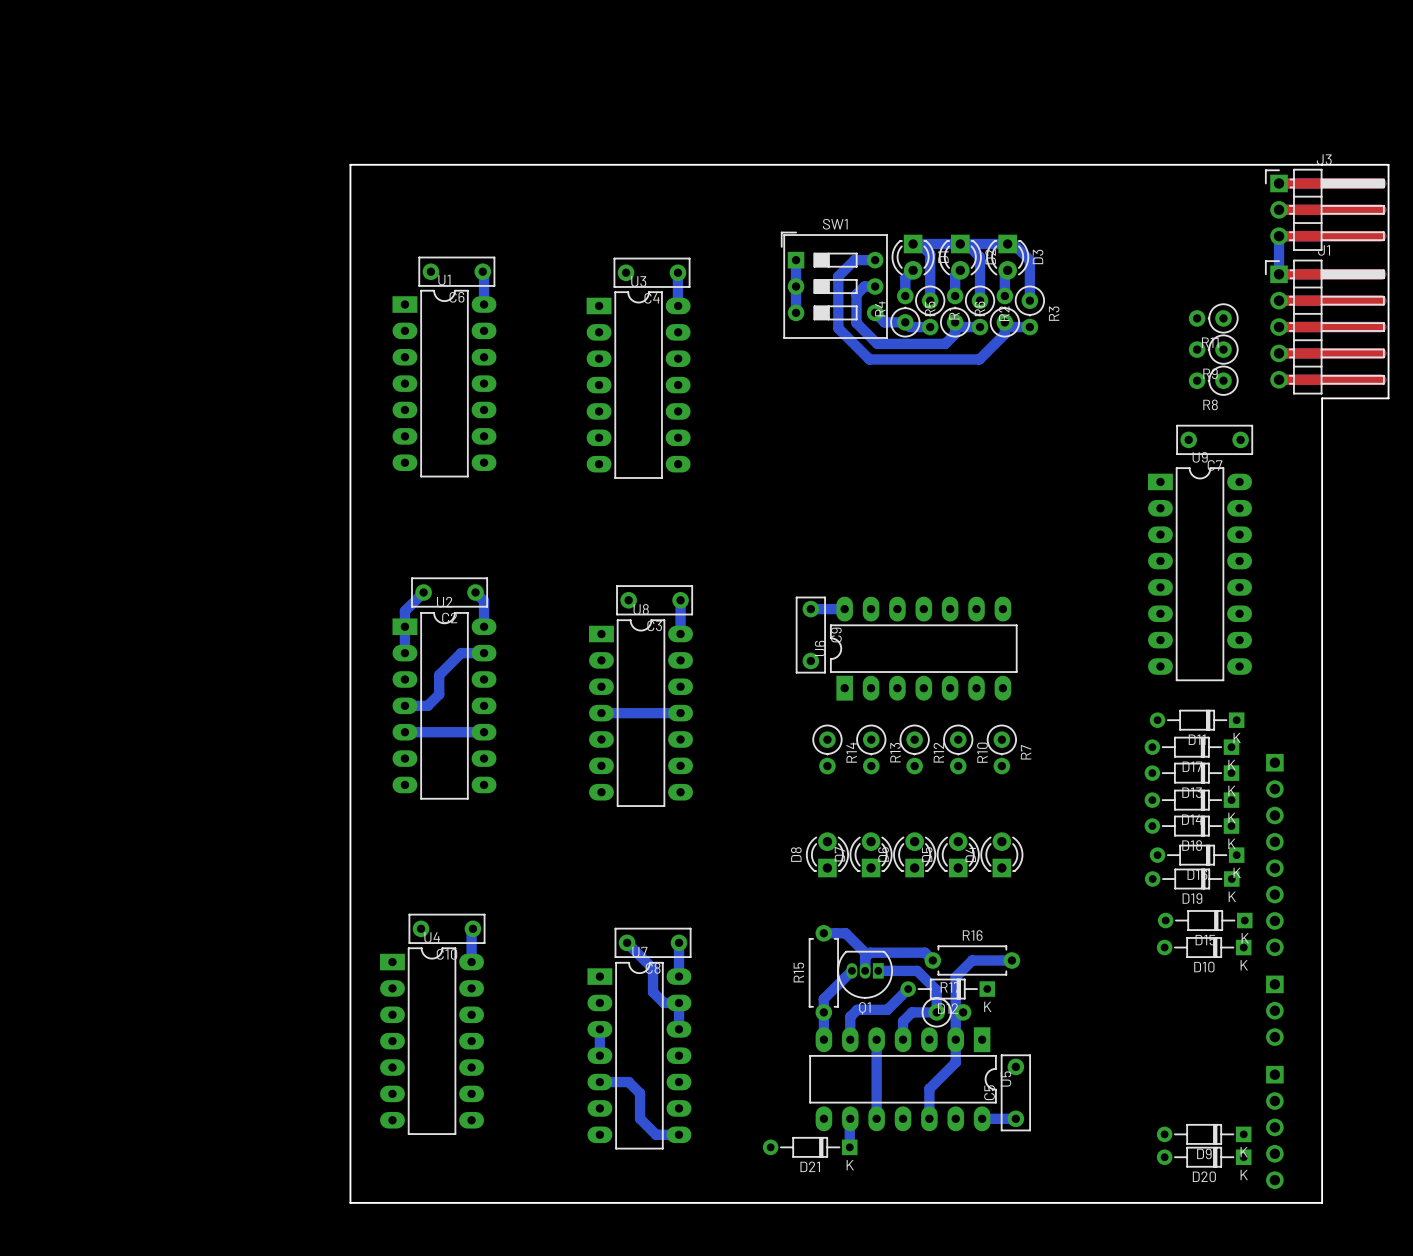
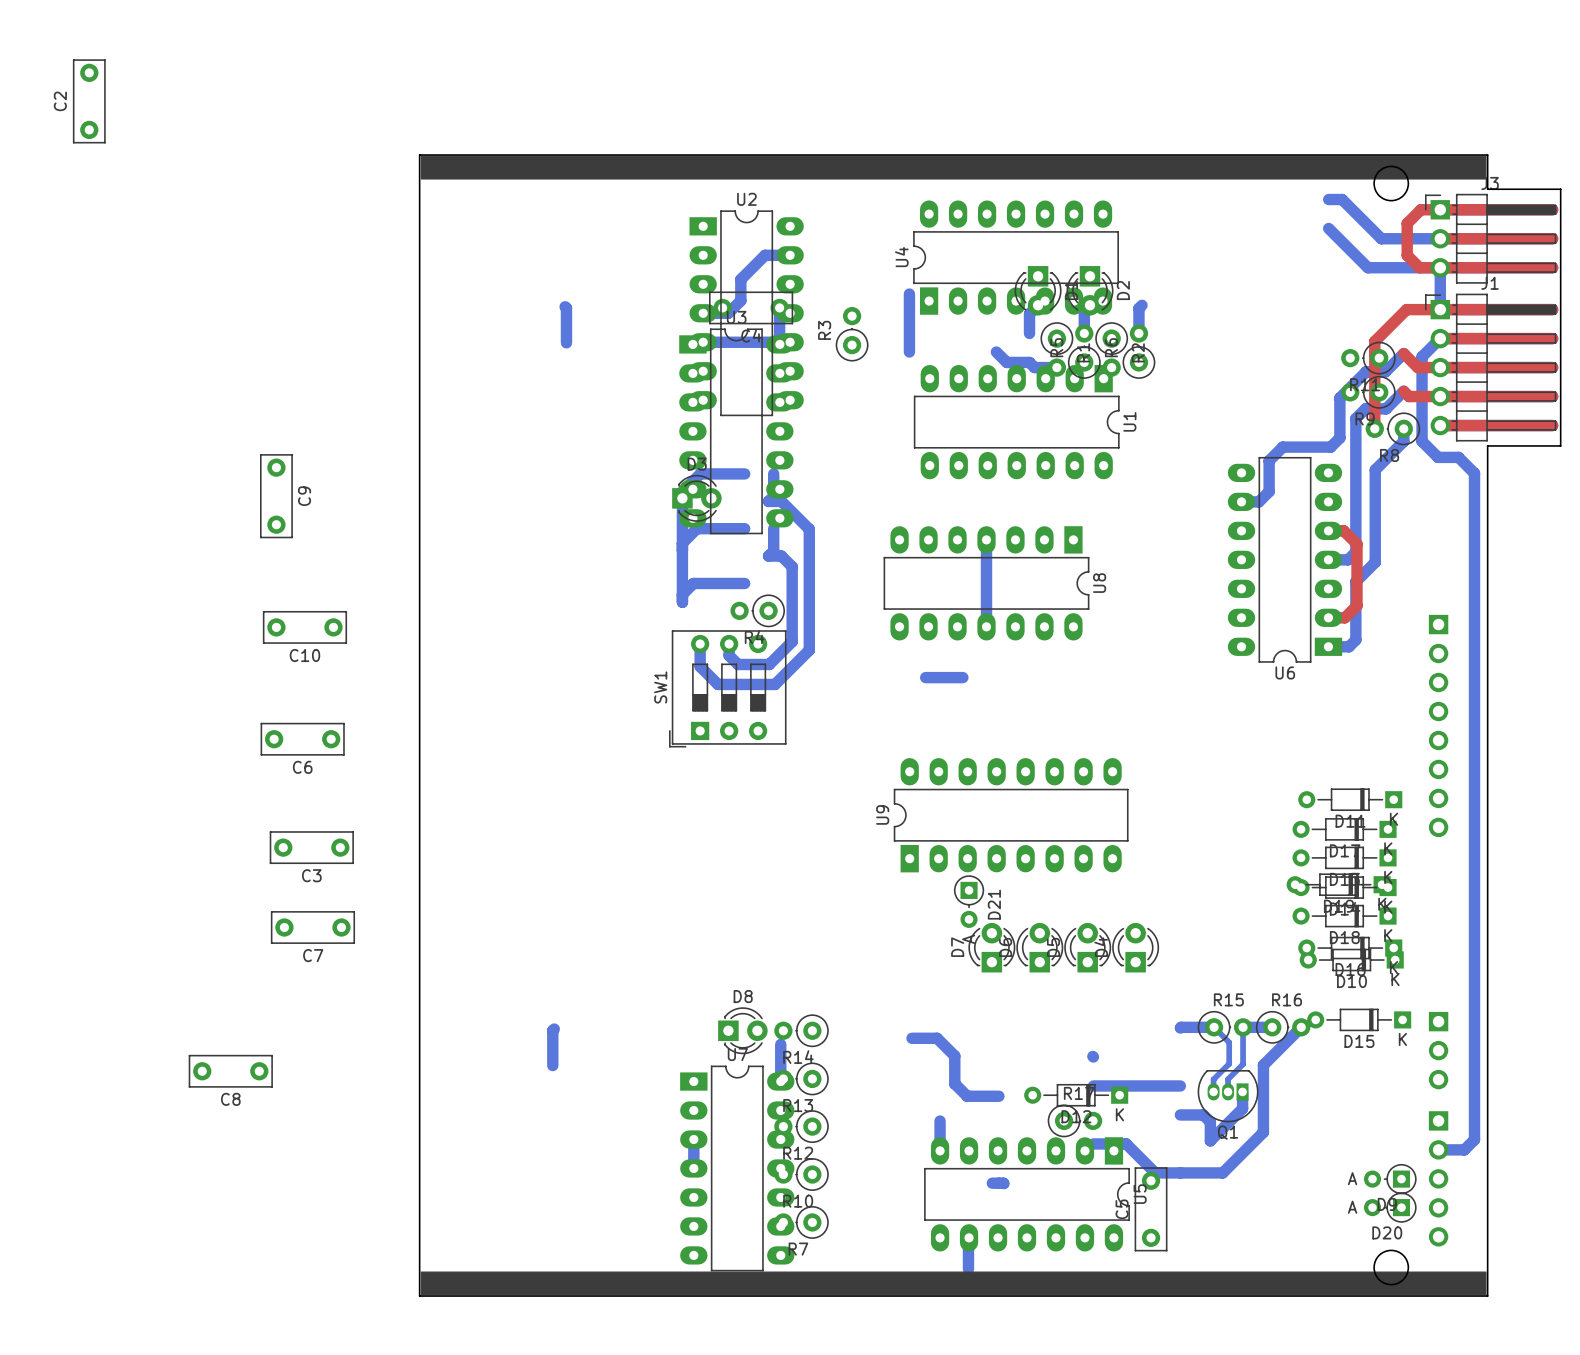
drawing: none -> [420, 155, 1487, 180]
round board edge: none -> [1373, 166, 1409, 201]
board edge: (350, 164) (1322, 164) -> (419, 189) (419, 155) (1487, 155) (1487, 189)
bottom track: none -> (1328, 199) (1342, 199) (1381, 238) (1440, 238)
top track: none -> (1440, 209) (1420, 209) (1407, 223) (1407, 255) (1419, 267) (1440, 267)
bottom track: none -> (1328, 228) (1367, 267) (1440, 267)
bottom track: none -> (790, 255) (765, 255) (740, 279) (740, 300) (728, 313) (703, 313)
bottom track: (913, 244) (1013, 244) (1029, 260) (1029, 300) -> none
bottom track: (920, 244) (930, 254) (930, 300) -> none
bottom track: (966, 244) (980, 257) (980, 300) -> none
D3 rotation: 0° (1007, 257) -> 90° counterclockwise (696, 498)
D3 position: (1007, 257) -> (696, 498)
bottom track: (875, 260) (854, 260) (838, 276) (838, 328) (869, 359) (979, 359) (1004, 334) (1004, 322) (1009, 327) (1029, 327) -> none
C6 position: (456, 271) -> (302, 739)
top track: none -> (1440, 309) (1406, 309) (1374, 341) (1374, 428)
SW1 rotation: 0° (834, 285) -> 90° counterclockwise (727, 688)
SW1 position: (834, 285) -> (727, 688)
bottom track: (875, 286) (864, 286) (856, 294) (856, 323) (877, 343) (945, 343) (955, 334) (955, 322) (959, 327) (980, 327) -> none
bottom track: none -> (1440, 338) (1422, 356) (1422, 441) (1438, 457) (1458, 457) (1474, 473) (1474, 1139) (1464, 1149) (1438, 1149)
bottom track: none -> (703, 342) (790, 342)
R3 rotation: 0° (1029, 310) -> 180° (852, 334)
R3 position: (1029, 310) -> (852, 334)
R4 rotation: 0° (905, 312) -> 90° counterclockwise (757, 610)
R4 position: (905, 312) -> (757, 610)
bottom track: none -> (1403, 353) (1385, 371) (1366, 371) (1339, 398) (1339, 437) (1330, 447) (1282, 447) (1269, 460) (1269, 491) (1258, 501) (1241, 501)
top track: none -> (1403, 353) (1417, 367) (1440, 367)
bottom track: none -> (1403, 391) (1386, 408) (1365, 408) (1355, 418) (1355, 552) (1348, 559) (1328, 559)
top track: none -> (1403, 391) (1409, 396) (1440, 396)
R8 position: (1213, 380) -> (1392, 428)
bottom track: none -> (1403, 428) (1403, 441) (1375, 469) (1375, 562) (1355, 581) (1355, 639) (1349, 646) (1328, 646)
U1 rotation: 0° (444, 383) -> 90° clockwise (1016, 422)
U1 position: (444, 383) -> (1016, 422)
bottom track: none -> (744, 473) (700, 473) (682, 491) (682, 602)
bottom track: none -> (773, 473) (773, 496) (768, 501) (781, 501) (809, 529) (809, 650) (775, 684) (718, 684) (700, 666) (700, 644)
C7 position: (1214, 439) -> (312, 927)
bottom track: none -> (744, 528) (696, 528) (682, 543)
bottom track: none -> (773, 528) (773, 550) (768, 556) (781, 556) (792, 566) (792, 641) (769, 664) (737, 664) (729, 655) (729, 644)
top track: none -> (1328, 530) (1343, 530) (1357, 544) (1357, 605) (1344, 617) (1328, 617)
bottom track: none -> (986, 539) (986, 626)
bottom track: none -> (744, 583) (693, 583) (682, 594)
U9 rotation: 0° (1200, 574) -> 90° counterclockwise (1011, 815)
U9 position: (1200, 574) -> (1011, 815)
bottom track: (423, 592) (404, 611) (404, 653) -> none
C2 rotation: 0° (449, 592) -> 90° clockwise (89, 101)
C2 position: (449, 592) -> (89, 101)
bottom track: (475, 592) (484, 601) (484, 626) -> none
C3 position: (654, 600) -> (311, 847)
bottom track: (680, 600) (680, 634) -> none
C9 position: (810, 635) -> (276, 496)
U6 rotation: 0° (923, 648) -> 90° counterclockwise (1285, 559)
U6 position: (923, 648) -> (1285, 559)
bottom track: (484, 653) (461, 653) (439, 675) (439, 694) (427, 705) (404, 705) -> none
U2 position: (444, 705) -> (746, 313)
bottom track: (601, 713) (680, 713) -> none
U8 rotation: 0° (641, 713) -> 90° clockwise (986, 583)
U8 position: (641, 713) -> (986, 583)
bottom track: (404, 732) (484, 732) -> none
R14 rotation: 0° (827, 749) -> 90° clockwise (801, 1030)
R14 position: (827, 749) -> (801, 1030)
R13 rotation: 0° (871, 749) -> 90° clockwise (801, 1078)
R13 position: (871, 749) -> (801, 1078)
R12 rotation: 0° (914, 749) -> 90° clockwise (801, 1126)
R12 position: (914, 749) -> (801, 1126)
R10 rotation: 0° (958, 749) -> 90° clockwise (801, 1174)
R10 position: (958, 749) -> (801, 1174)
R7 rotation: 0° (1001, 749) -> 90° clockwise (801, 1222)
R7 position: (1001, 749) -> (801, 1222)
D8 rotation: 0° (827, 854) -> 90° clockwise (742, 1030)
D8 position: (827, 854) -> (742, 1030)
part position: (1274, 855) -> (1438, 725)
D19 position: (1192, 879) -> (1338, 884)
R15 footprint: [808, 924, 839, 1021] -> [1197, 1011, 1253, 1044]
bottom track: none -> (1180, 1028) (1214, 1027) (1229, 1042) (1229, 1063) (1213, 1079) (1213, 1091)
bottom track: none -> (1272, 1027) (1243, 1027) (1243, 1064) (1228, 1079) (1228, 1091)
bottom track: none -> (1301, 1027) (1263, 1065) (1263, 1132) (1222, 1172) (1155, 1172) (1126, 1143) (1093, 1143)
C10 position: (446, 928) -> (304, 627)
bottom track: (823, 933) (845, 933) (865, 952) (865, 970) -> none
bottom track: none -> (911, 1038) (937, 1038) (954, 1055) (954, 1083) (967, 1096) (998, 1096)
bottom track: (627, 942) (653, 968) (653, 992) (663, 1002) (679, 1002) (679, 1029) -> none
C8 position: (653, 942) -> (230, 1071)
R16 footprint: [924, 945, 1021, 976] -> [1255, 1011, 1311, 1044]
D10 position: (1204, 947) -> (1351, 960)
bottom track: none -> (1092, 1056) (1093, 1057)
bottom track: (865, 957) (870, 952) (925, 952) (932, 960) -> none
bottom track: (1011, 960) (972, 960) (955, 977) (955, 1062) (929, 1088) (929, 1118) -> none
bottom track: (851, 970) (823, 999) (823, 1012) -> none
bottom track: (878, 970) (917, 970) (936, 990) (936, 1012) (912, 1012) (903, 1021) (903, 1039) -> none
R15 name position: R15 (798, 972) -> R15 (1228, 999)
Q1 position: (865, 974) -> (1228, 1096)
bottom track: none -> (1093, 1085) (1180, 1085)
bottom track: none -> (1242, 1091) (1242, 1108) (1210, 1140) (1210, 1122) (1203, 1114) (1180, 1114)
bottom track: (908, 989) (887, 1009) (857, 1009) (850, 1016) (850, 1039) -> none
part position: (1274, 1010) -> (1438, 1050)
bottom track: (876, 1039) (876, 1118) -> none
U4 rotation: 0° (432, 1041) -> 90° counterclockwise (1016, 257)
U4 position: (432, 1041) -> (1016, 257)
bottom track: none -> (992, 1183) (1003, 1183)
bottom track: (599, 1082) (628, 1082) (640, 1093) (640, 1118) (656, 1134) (679, 1134) -> none
bottom track: (982, 1118) (1015, 1118) -> none
D9 footprint: [1156, 1124, 1252, 1145] -> [1363, 1164, 1417, 1195]
part position: (1274, 1127) -> (1438, 1178)
round board edge: none -> [1373, 1250, 1409, 1285]
D21 footprint: [762, 1137, 858, 1158] -> [954, 875, 985, 928]
D20 footprint: [1156, 1147, 1252, 1168] -> [1363, 1192, 1417, 1223]
drawing: none -> [420, 1271, 1487, 1296]
D21 name position: D21 (810, 1166) -> D21 (994, 904)
board edge: (350, 1171) (350, 1202) (1322, 1202) (1322, 1171) -> (419, 1296) (1487, 1296)

